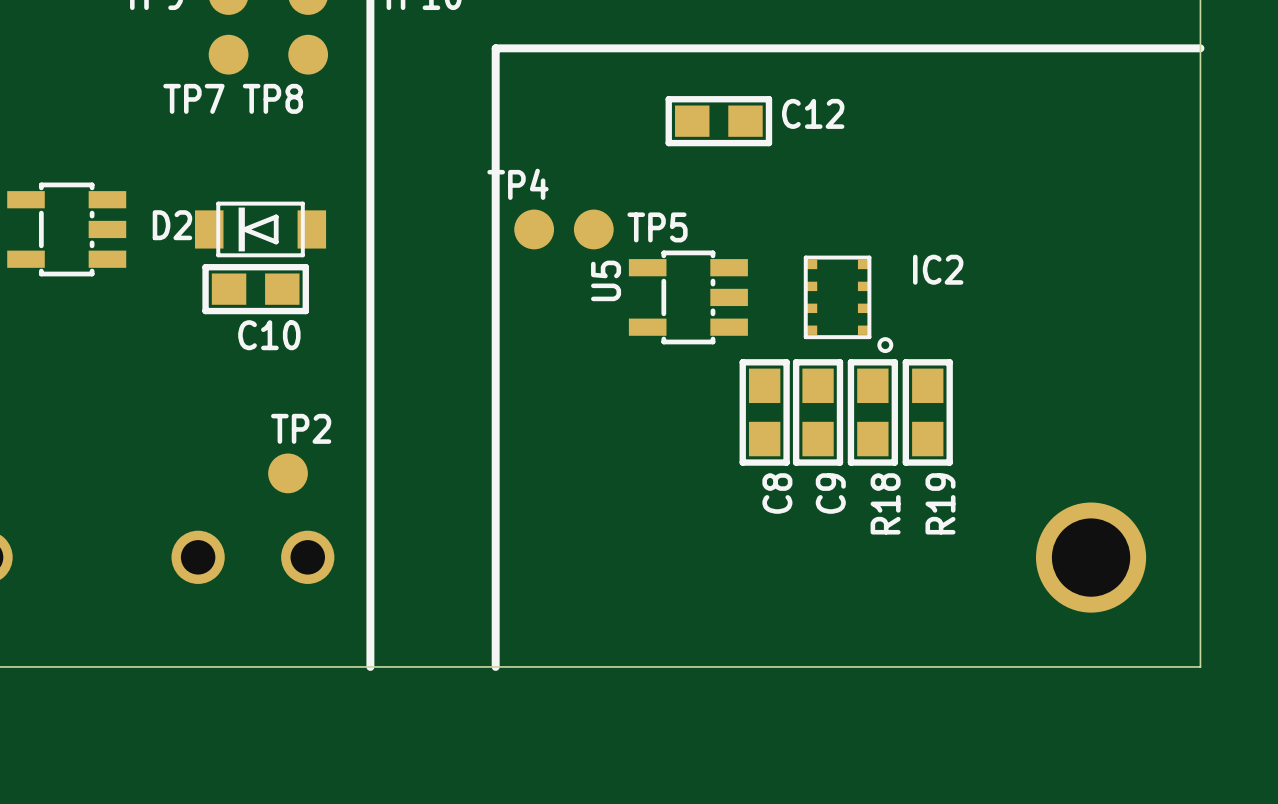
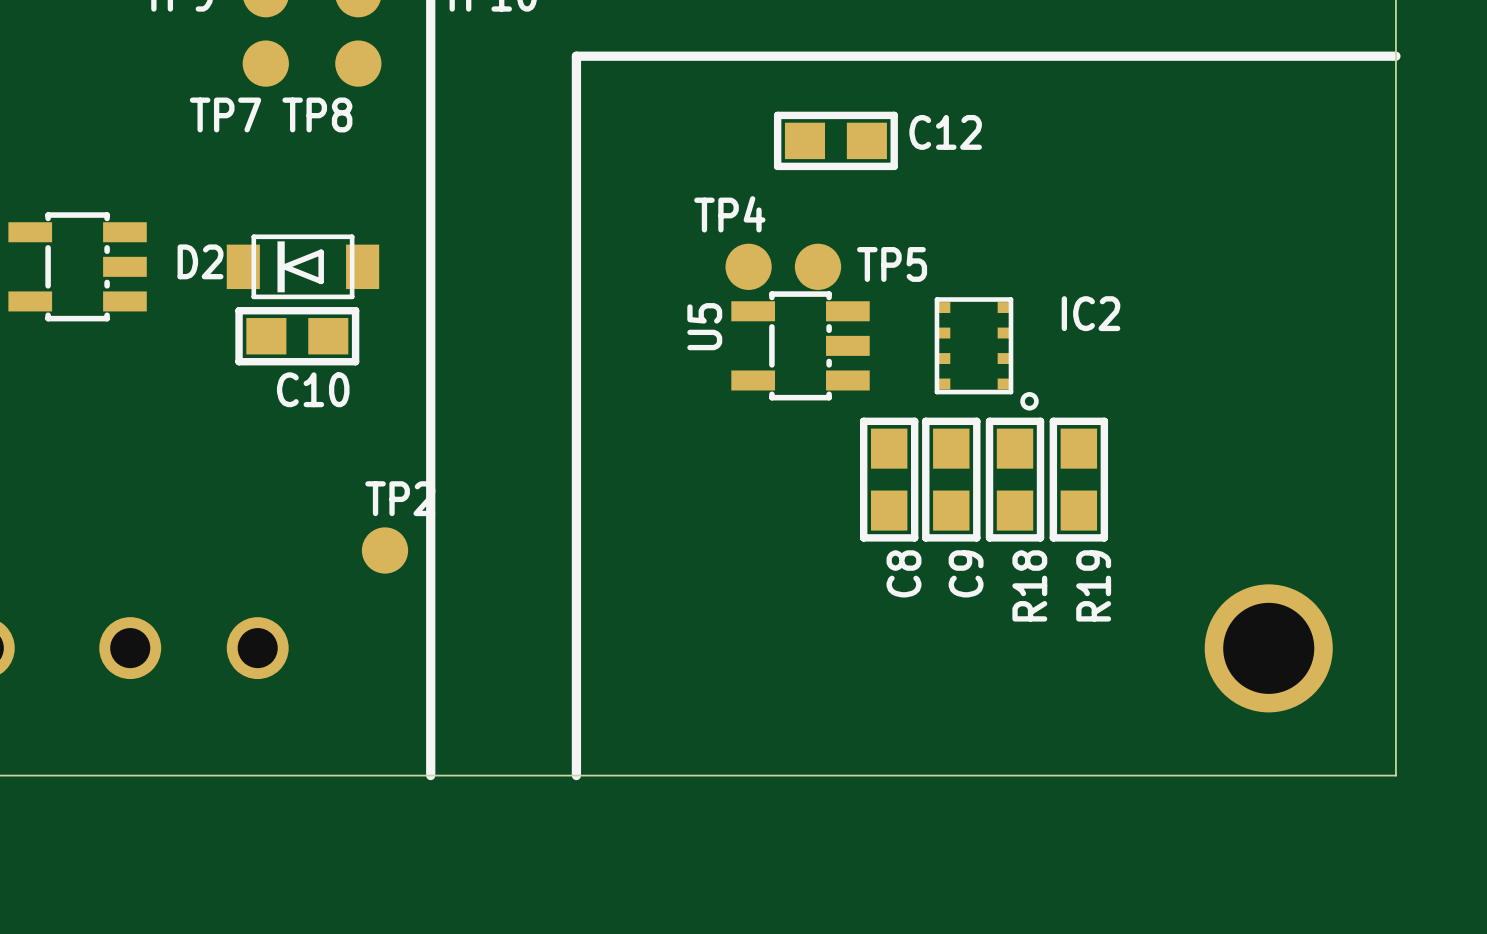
TP4 position: (534, 229) -> (748, 266)
TP5 position: (593, 229) -> (818, 266)
TP2 position: (288, 473) -> (385, 550)
part position: (252, 557) -> (193, 648)

